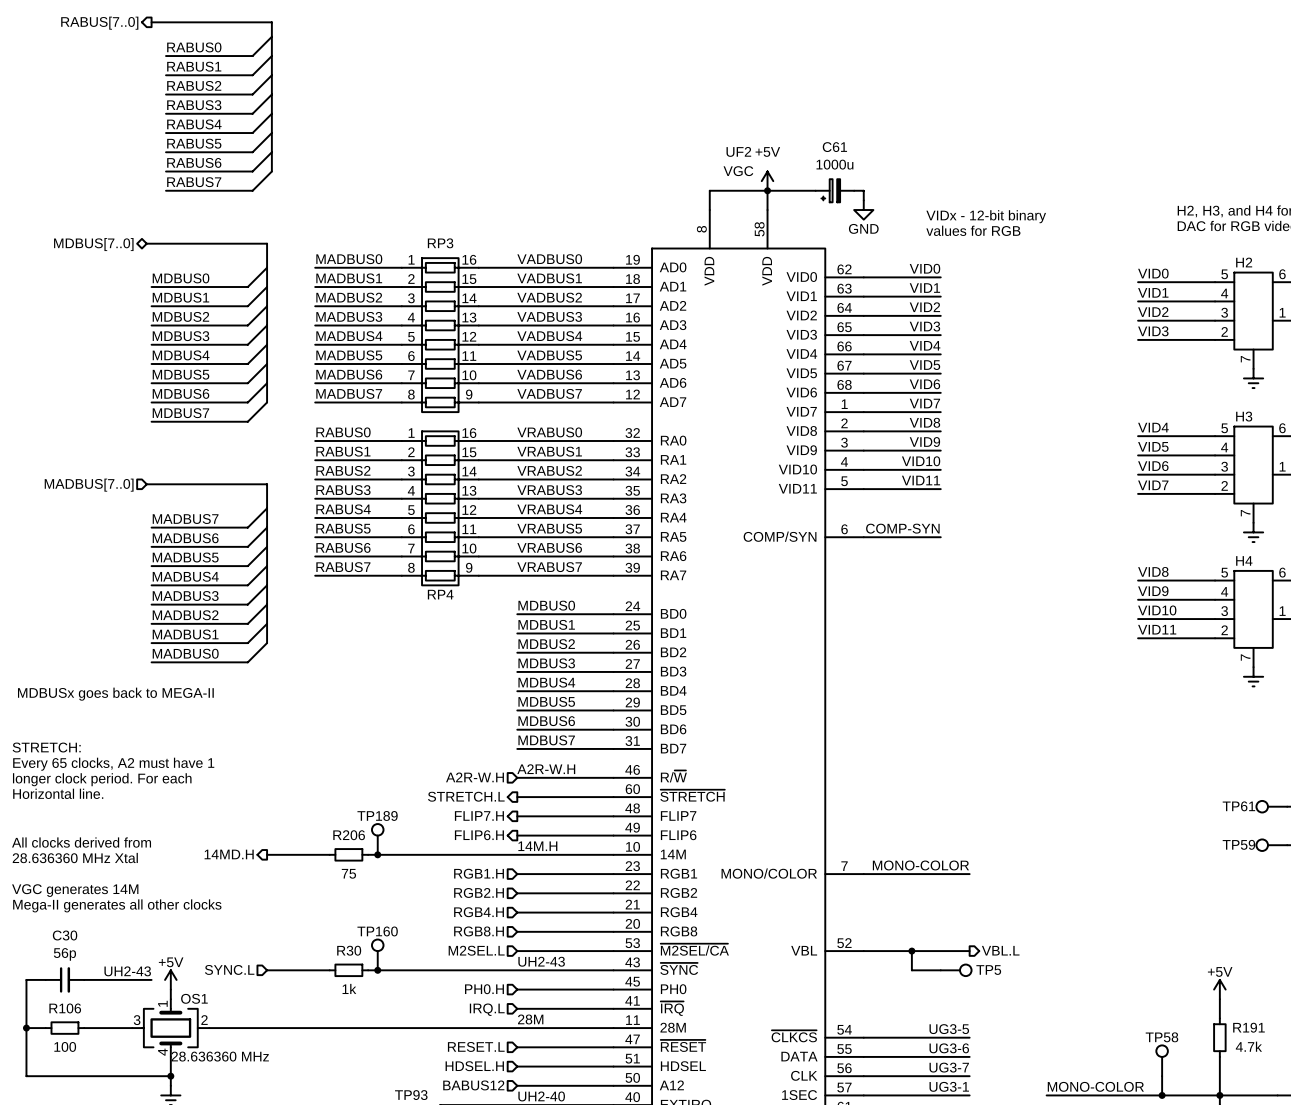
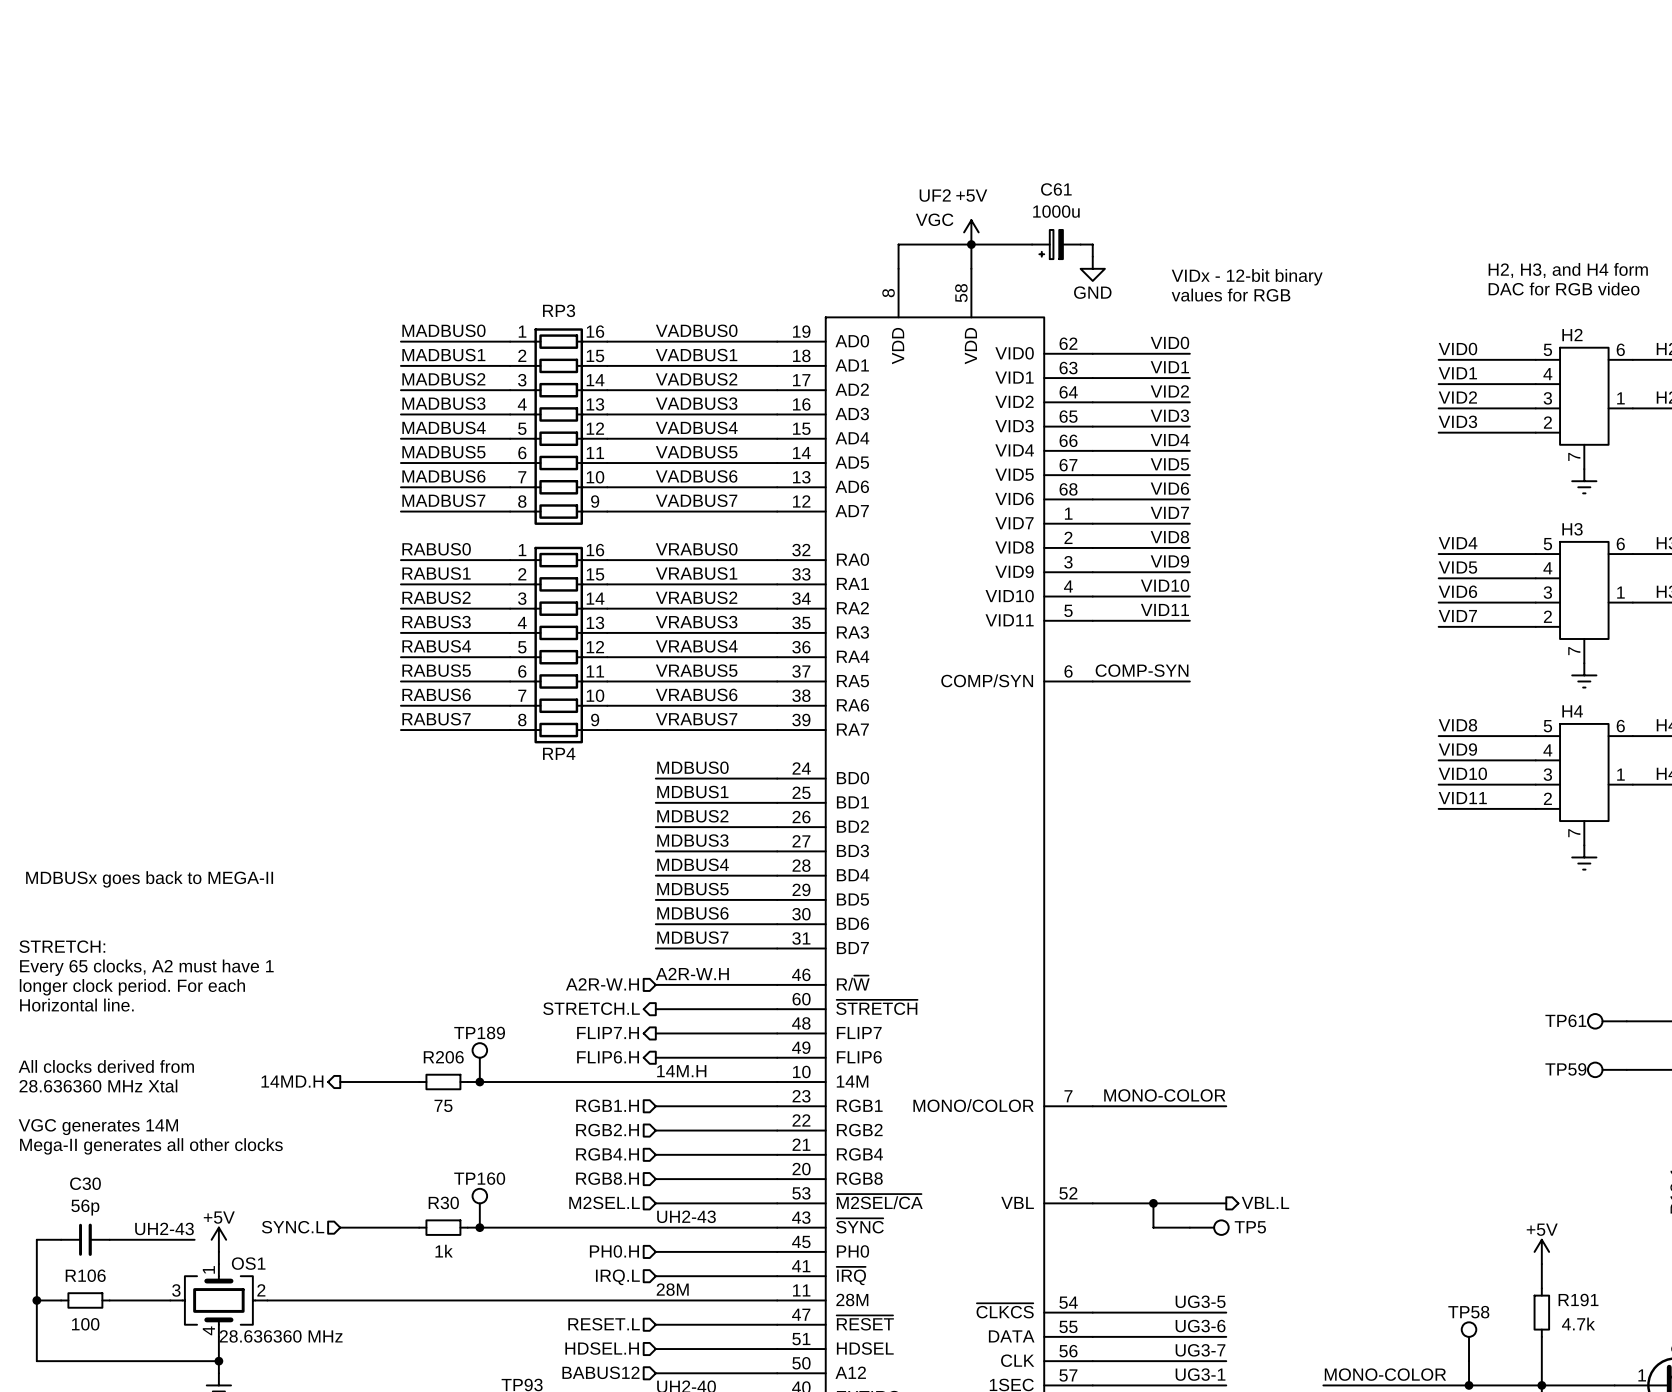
bus: (151, 22) (271, 22) (271, 171) -> none
hierarchical label: RABUS[7..0] (99, 23) -> none
wire: (271, 36) (252, 56) (166, 56) -> none
label: RABUS0 (194, 47) -> none
wire: (271, 56) (252, 75) (166, 75) -> none
label: RABUS1 (194, 66) -> none
wire: (271, 75) (252, 94) (166, 94) -> none
label: RABUS2 (194, 85) -> none
wire: (271, 94) (252, 113) (166, 113) -> none
label: RABUS3 (194, 105) -> none
wire: (271, 113) (252, 133) (166, 133) -> none
label: RABUS4 (194, 124) -> none
wire: (271, 133) (252, 152) (166, 152) -> none
label: RABUS5 (194, 143) -> none
wire: (271, 152) (252, 171) (166, 171) -> none
label: RABUS6 (194, 162) -> none
wire: (271, 171) (252, 190) (166, 190) -> none
label: RABUS7 (194, 182) -> none
bus: (146, 243) (267, 243) (267, 402) -> none
hierarchical label: MDBUS[7..0] (93, 244) -> none
wire: (267, 267) (247, 287) (151, 287) -> none
label: MDBUS0 (181, 278) -> none
wire: (267, 287) (247, 306) (151, 306) -> none
label: MDBUS1 (180, 297) -> none
wire: (267, 306) (247, 325) (151, 325) -> none
label: MDBUS2 (180, 316) -> none
wire: (267, 325) (247, 344) (151, 344) -> none
label: MDBUS3 (180, 336) -> none
wire: (267, 344) (247, 364) (151, 364) -> none
label: MDBUS4 (181, 355) -> none
wire: (267, 364) (247, 383) (151, 383) -> none
label: MDBUS5 (181, 374) -> none
wire: (267, 383) (247, 402) (151, 402) -> none
label: MDBUS6 (180, 393) -> none
wire: (267, 402) (247, 421) (151, 421) -> none
label: MDBUS7 (180, 413) -> none
bus: (146, 484) (267, 484) (267, 643) -> none
hierarchical label: MADBUS[7..0] (89, 485) -> none
wire: (267, 508) (247, 527) (151, 527) -> none
label: MADBUS7 (185, 519) -> none
wire: (267, 527) (247, 546) (151, 546) -> none
label: MADBUS6 (185, 538) -> none
wire: (267, 546) (247, 566) (151, 566) -> none
label: MADBUS5 (185, 557) -> none
wire: (267, 566) (247, 585) (151, 585) -> none
label: MADBUS4 (185, 576) -> none
wire: (267, 585) (247, 604) (151, 604) -> none
label: MADBUS3 (185, 596) -> none
wire: (267, 604) (247, 623) (151, 623) -> none
label: MADBUS2 (185, 615) -> none
wire: (267, 623) (247, 643) (151, 643) -> none
label: MADBUS1 (185, 634) -> none
wire: (267, 643) (247, 662) (151, 662) -> none
label: MADBUS0 (185, 653) -> none

